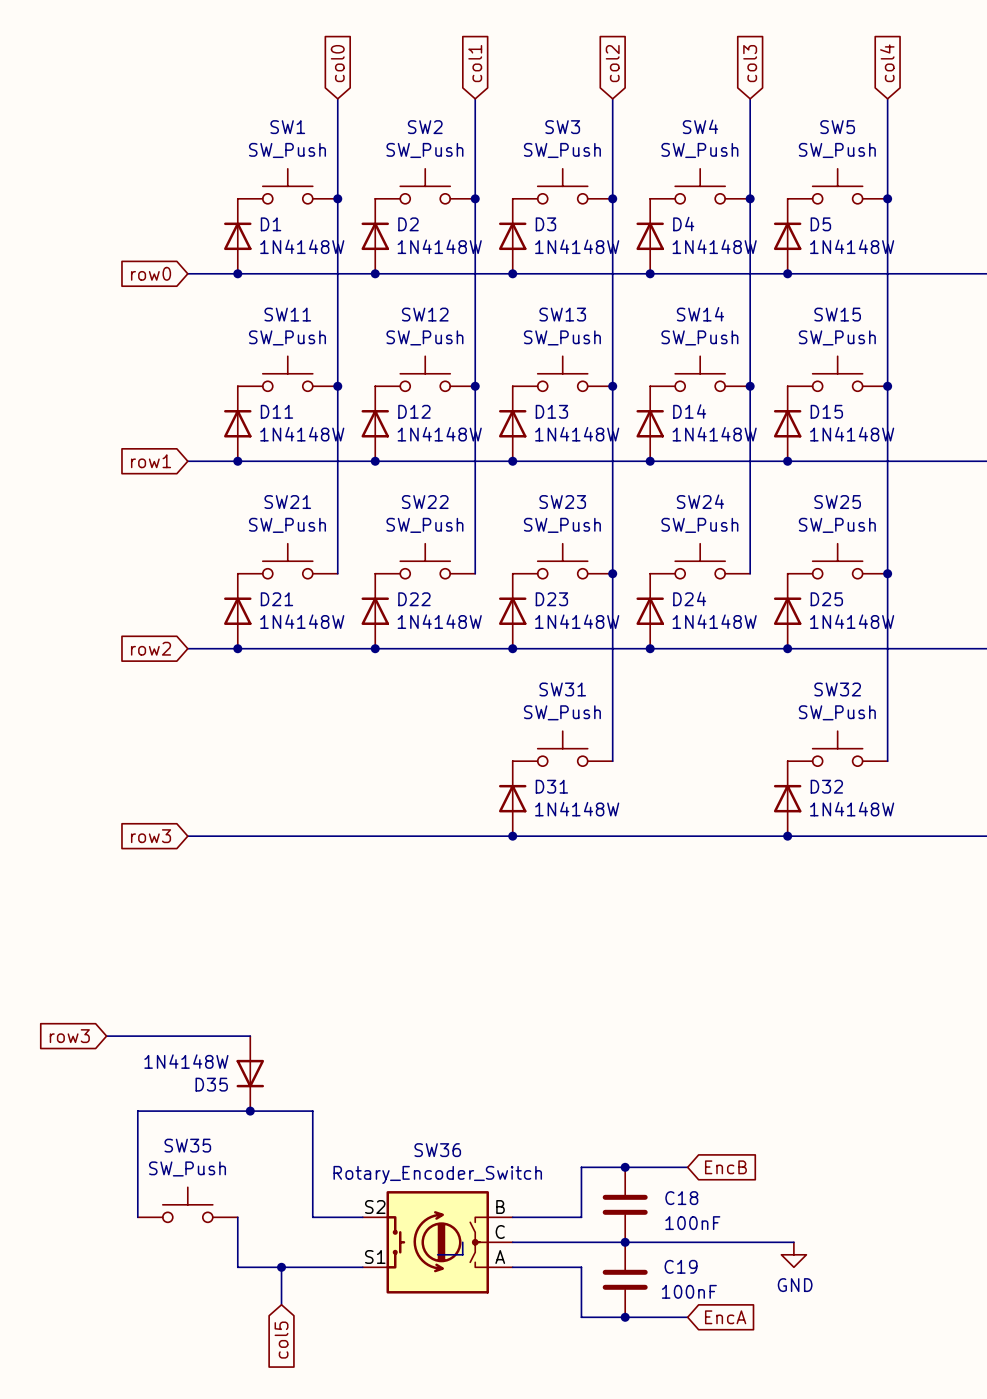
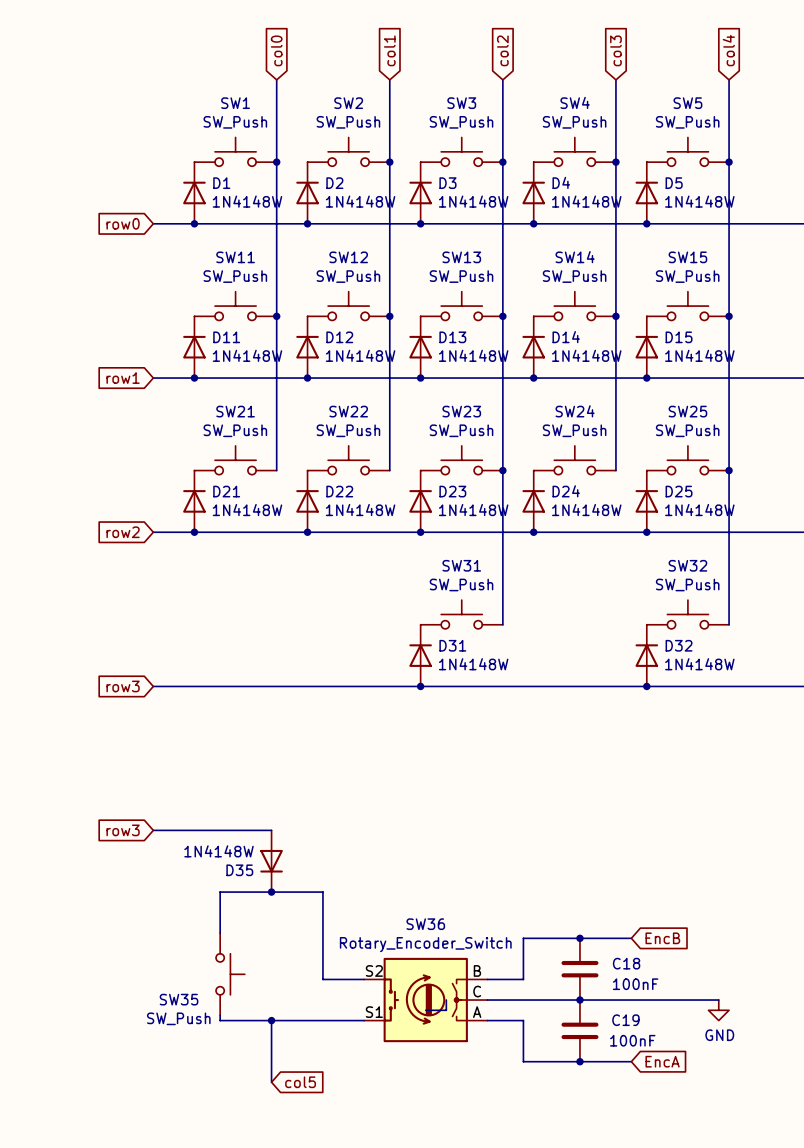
global label position: row3 (69, 1036) -> row3 (123, 830)
wire: (106, 1036) (250, 1036) -> (153, 830) (271, 830)
D35 position: (250, 1073) -> (271, 861)
junction: none -> (271, 892)
junction: (250, 1111) -> none
wire: none -> (220, 933) (220, 892) (322, 892) (322, 979) (364, 979)
junction: none -> (579, 938)
wire: none -> (631, 938) (523, 938) (523, 979) (487, 979)
SW35 name position: SW35 (187, 1145) -> SW35 (179, 999)
junction: (625, 1167) -> none
wire: (687, 1167) (581, 1167) (581, 1217) (512, 1217) -> none
global label position: EncB (725, 1167) -> EncB (662, 938)
SW35 value position: SW_Push (187, 1168) -> SW_Push (178, 1018)
SW35 rotation: 0° (187, 1204) -> 90° clockwise (230, 974)
SW35 position: (187, 1204) -> (230, 974)
C18 position: (625, 1204) -> (579, 969)
wire: (137, 1217) (137, 1111) (312, 1111) (312, 1217) (362, 1217) -> none
wire: (237, 1217) (237, 1267) (362, 1267) -> none
wire: none -> (487, 1000) (718, 1000)
junction: none -> (579, 1000)
wire: none -> (220, 1015) (220, 1020) (364, 1020)
wire: none -> (271, 1020) (271, 1082)
SW36 position: (437, 1242) -> (425, 1000)
bus: (462, 1242) (462, 1254) (437, 1254) -> (446, 1000) (446, 1010) (425, 1010)
junction: (625, 1242) -> none
wire: (637, 1242) (793, 1242) -> (523, 1020) (523, 1061) (631, 1061)
power symbol position: GND (793, 1254) -> GND (718, 1010)
wire: (281, 1267) (281, 1304) -> none
junction position: (281, 1267) -> (271, 1020)
wire: (512, 1267) (581, 1267) (581, 1317) (687, 1317) -> none
C19 position: (625, 1279) -> (579, 1030)
junction: none -> (579, 1061)
junction: (625, 1317) -> none
global label position: EncA (725, 1317) -> EncA (662, 1061)
global label rotation: 0° (281, 1340) -> 90° counterclockwise (300, 1082)
global label position: col5 (281, 1340) -> col5 (300, 1082)

